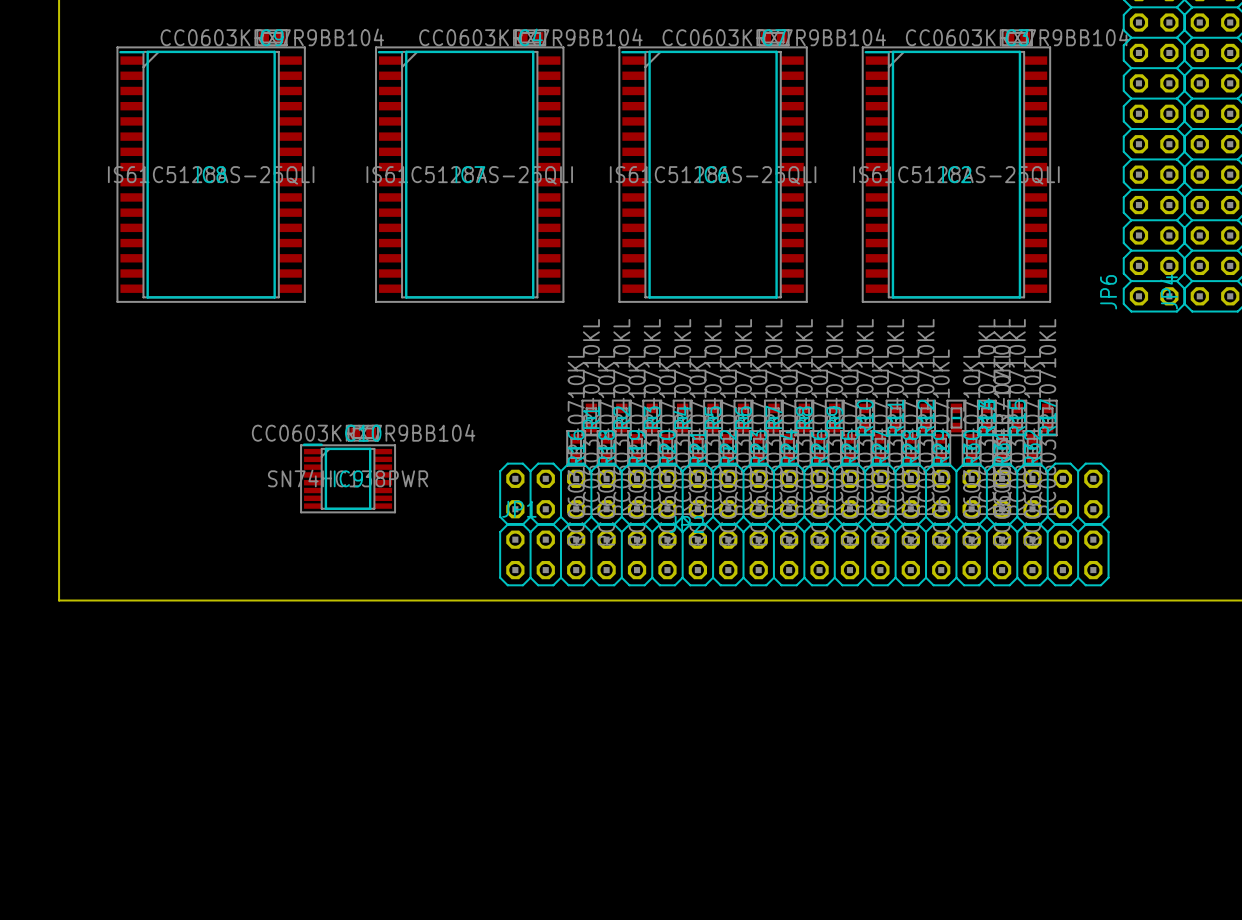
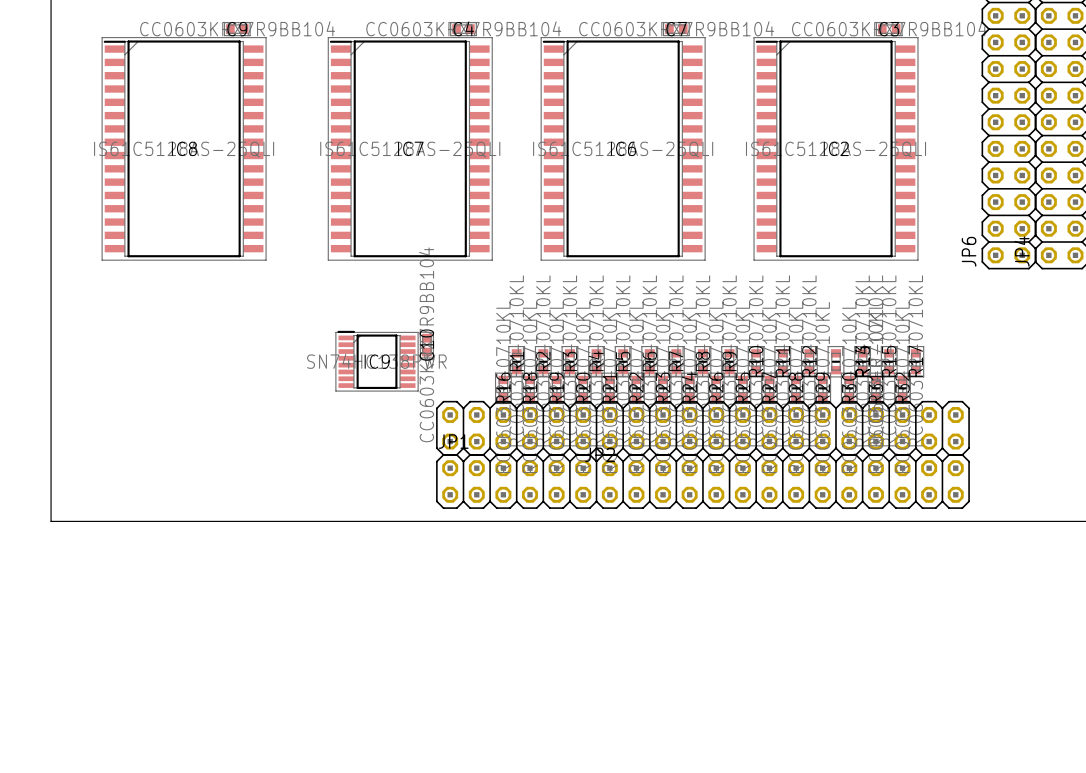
C10 rotation: 0° (363, 433) -> 90° clockwise (426, 345)
C10 position: (363, 433) -> (426, 345)
IC9 position: (348, 478) -> (377, 361)

